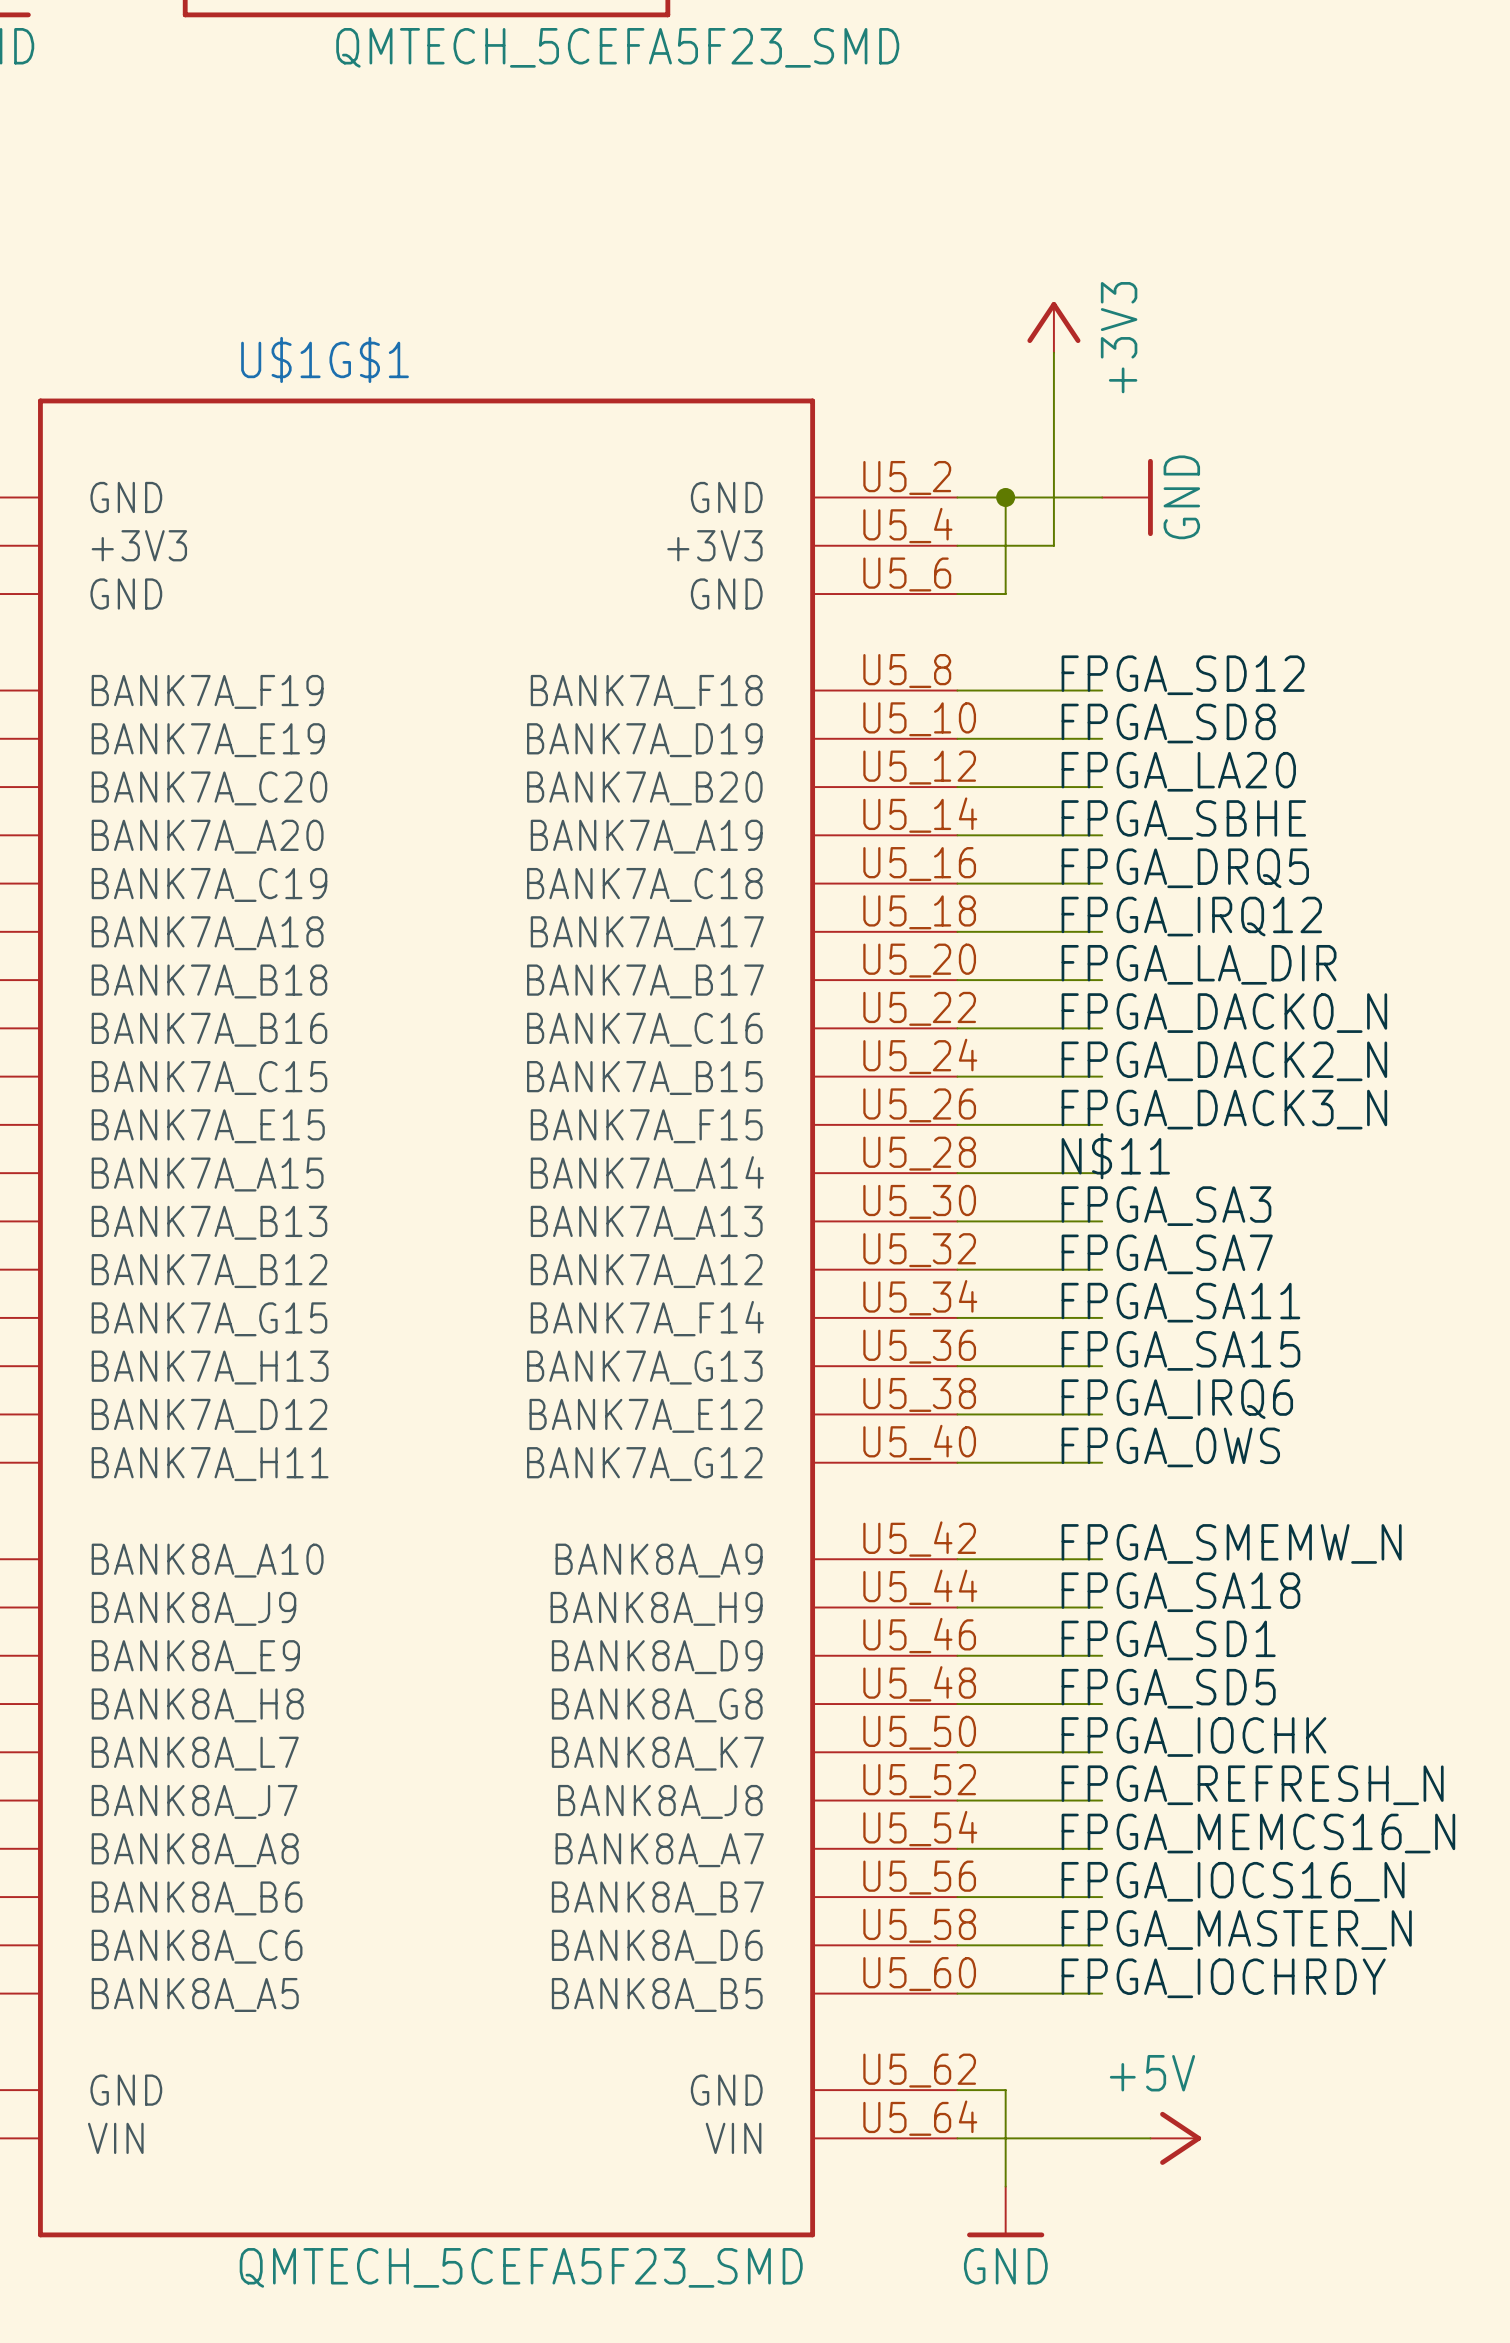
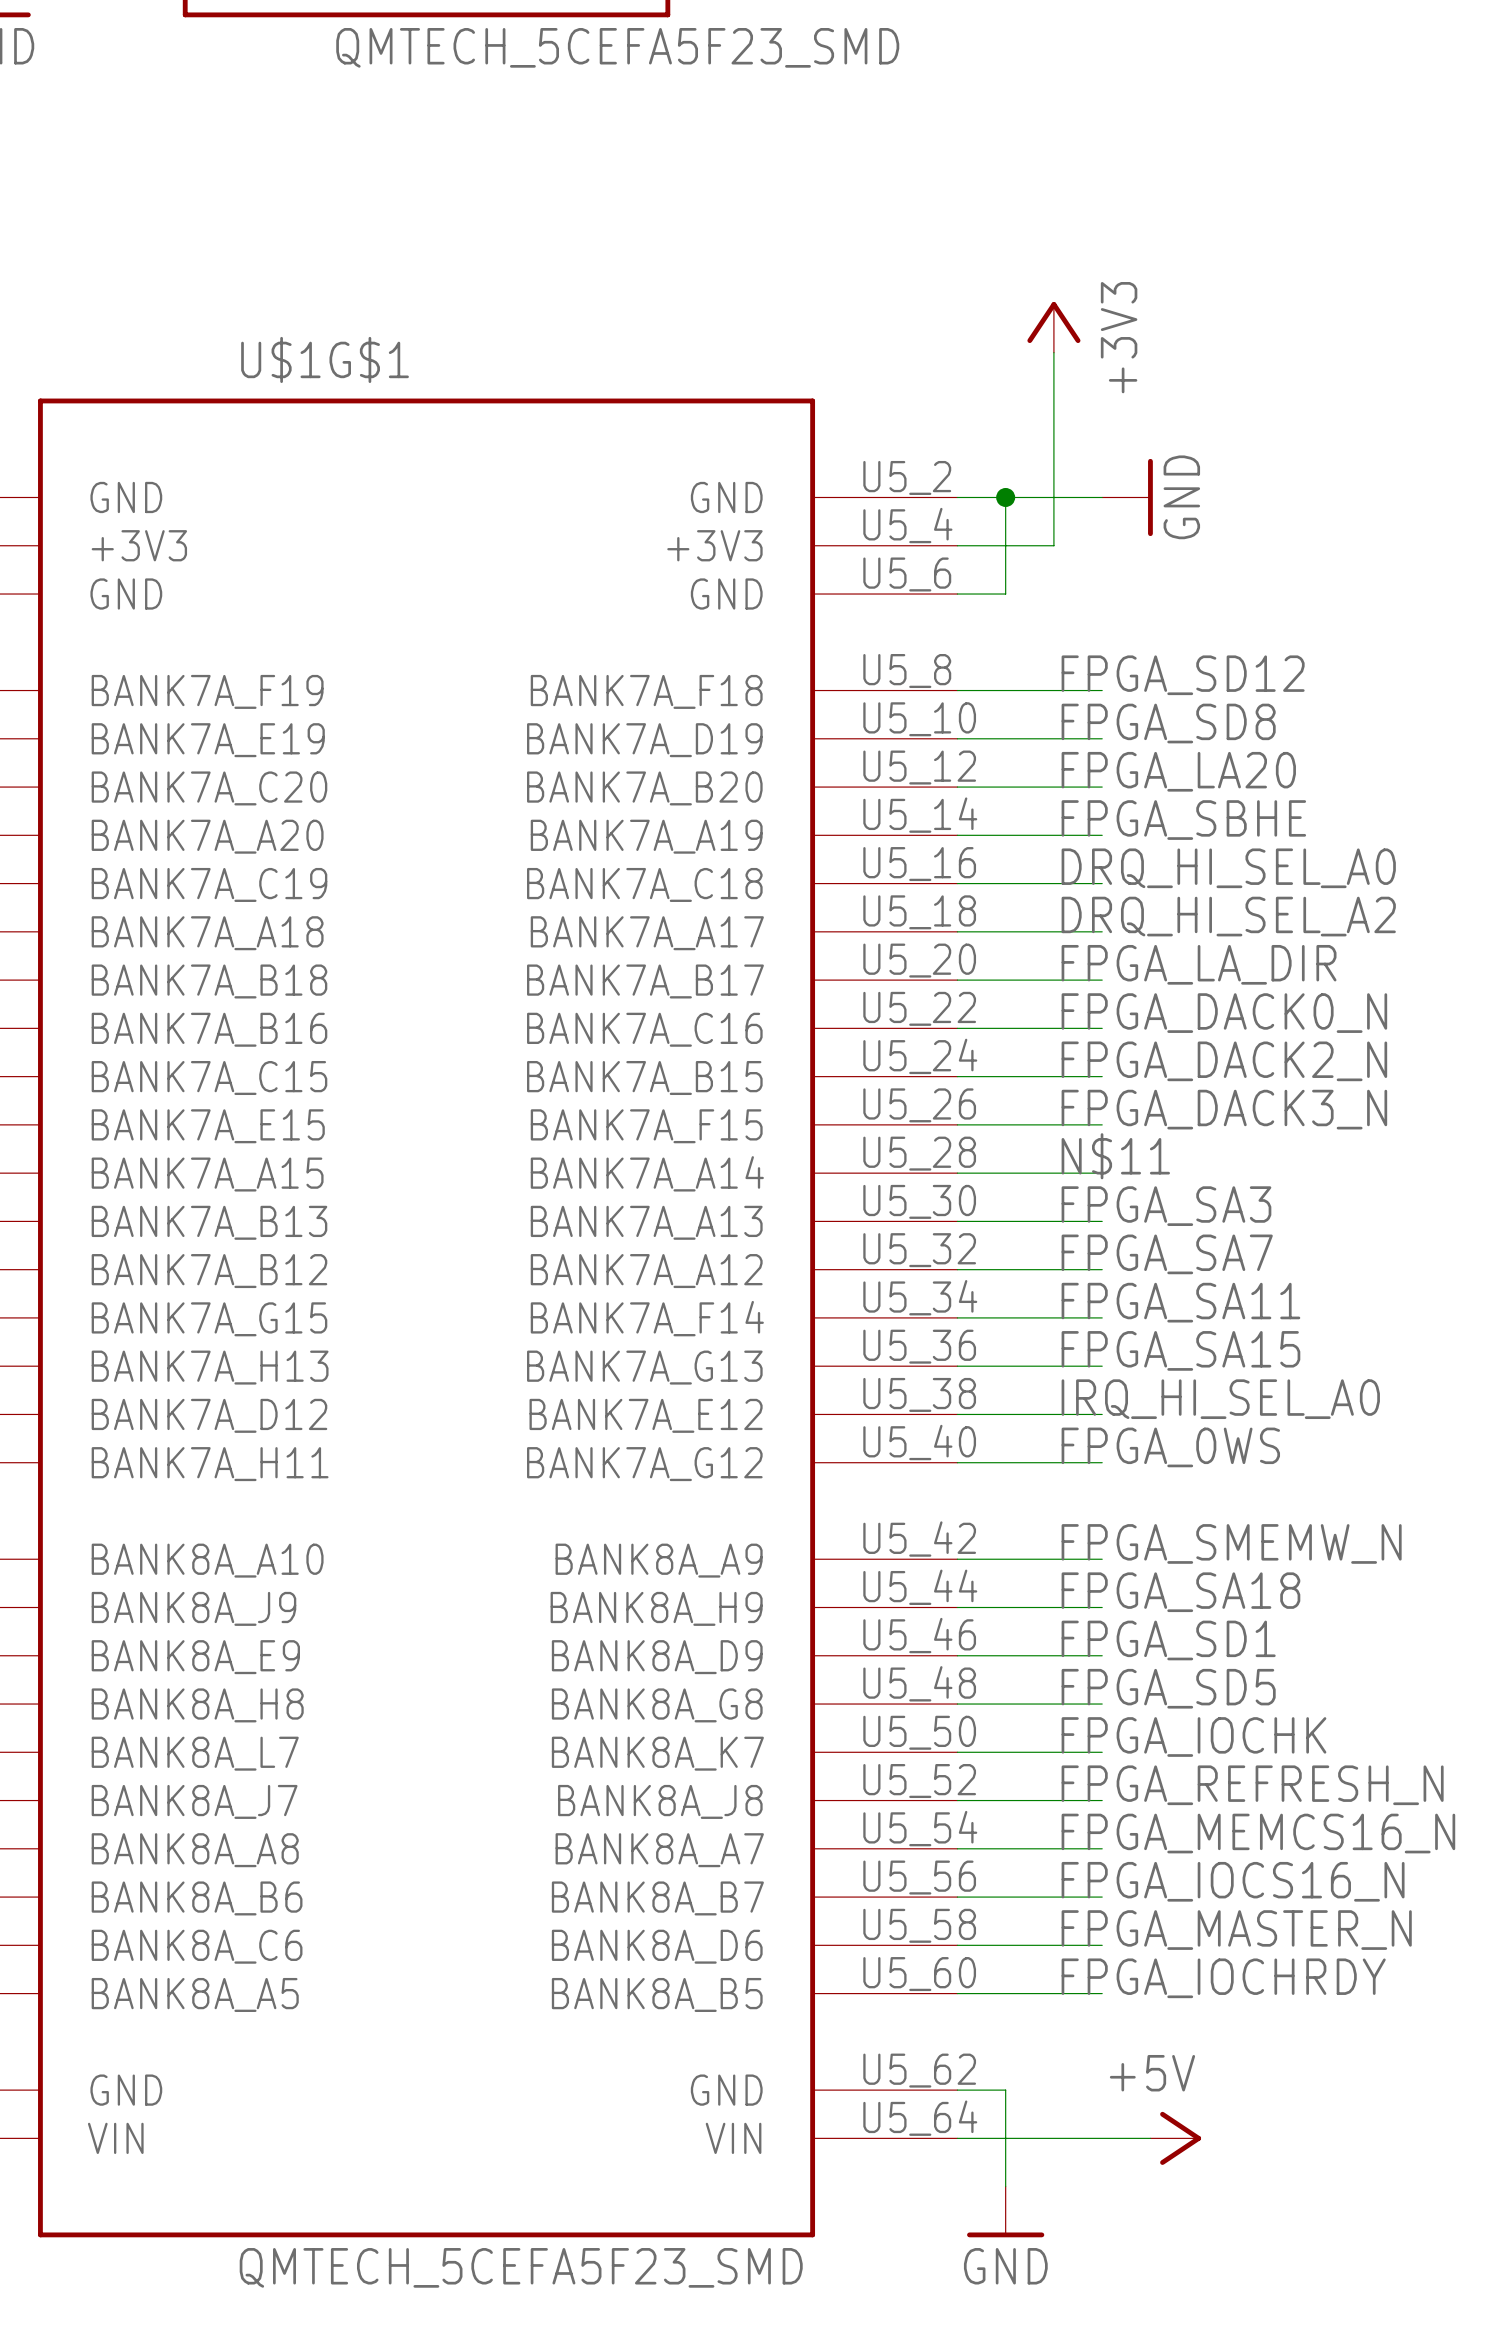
label: FPGA_DRQ5 (1185, 868) -> DRQ_HI_SEL_A0 (1228, 868)
label: FPGA_IRQ12 (1191, 916) -> DRQ_HI_SEL_A2 (1228, 916)
label: FPGA_IRQ6 (1177, 1399) -> IRQ_HI_SEL_A0 (1220, 1399)

